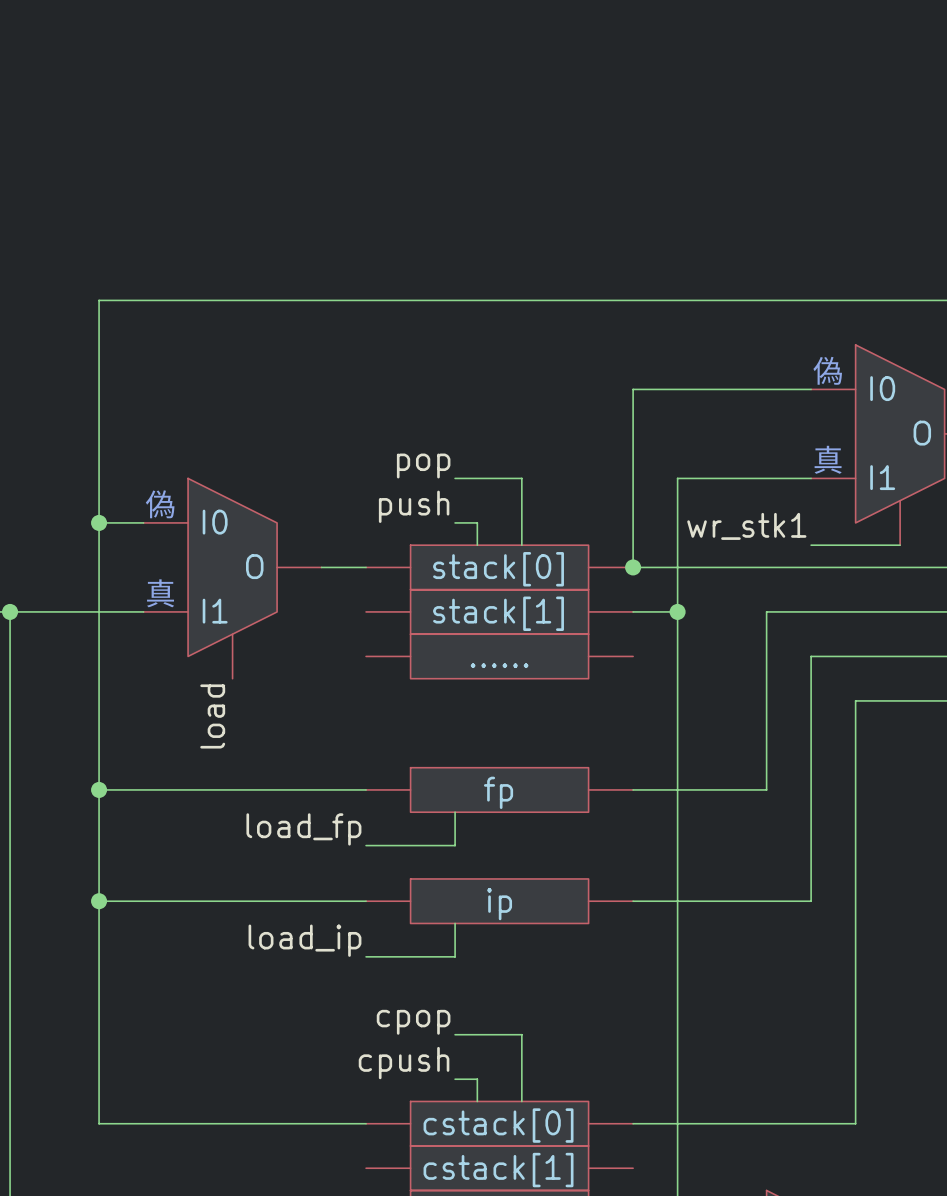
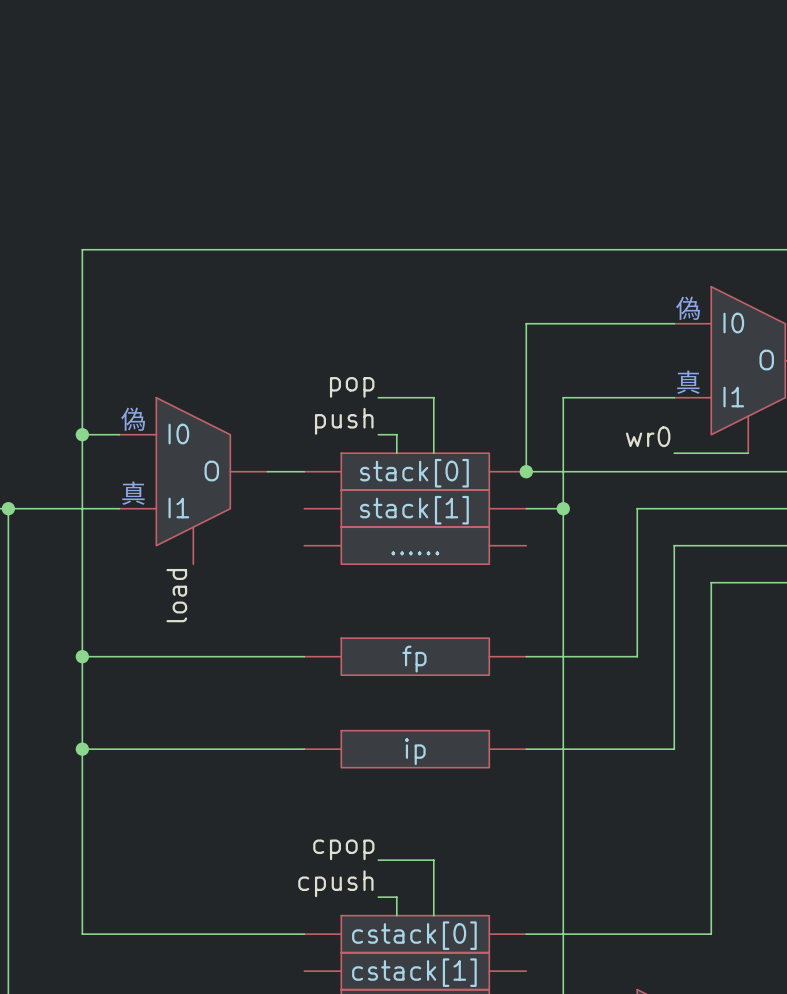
label: wr_stk1 (746, 526) -> wr0 (648, 436)
wire: (455, 812) (455, 845) (366, 845) -> none
label: load_fp (303, 829) -> none
wire: (455, 923) (455, 956) (366, 956) -> none
label: load_ip (304, 940) -> none

